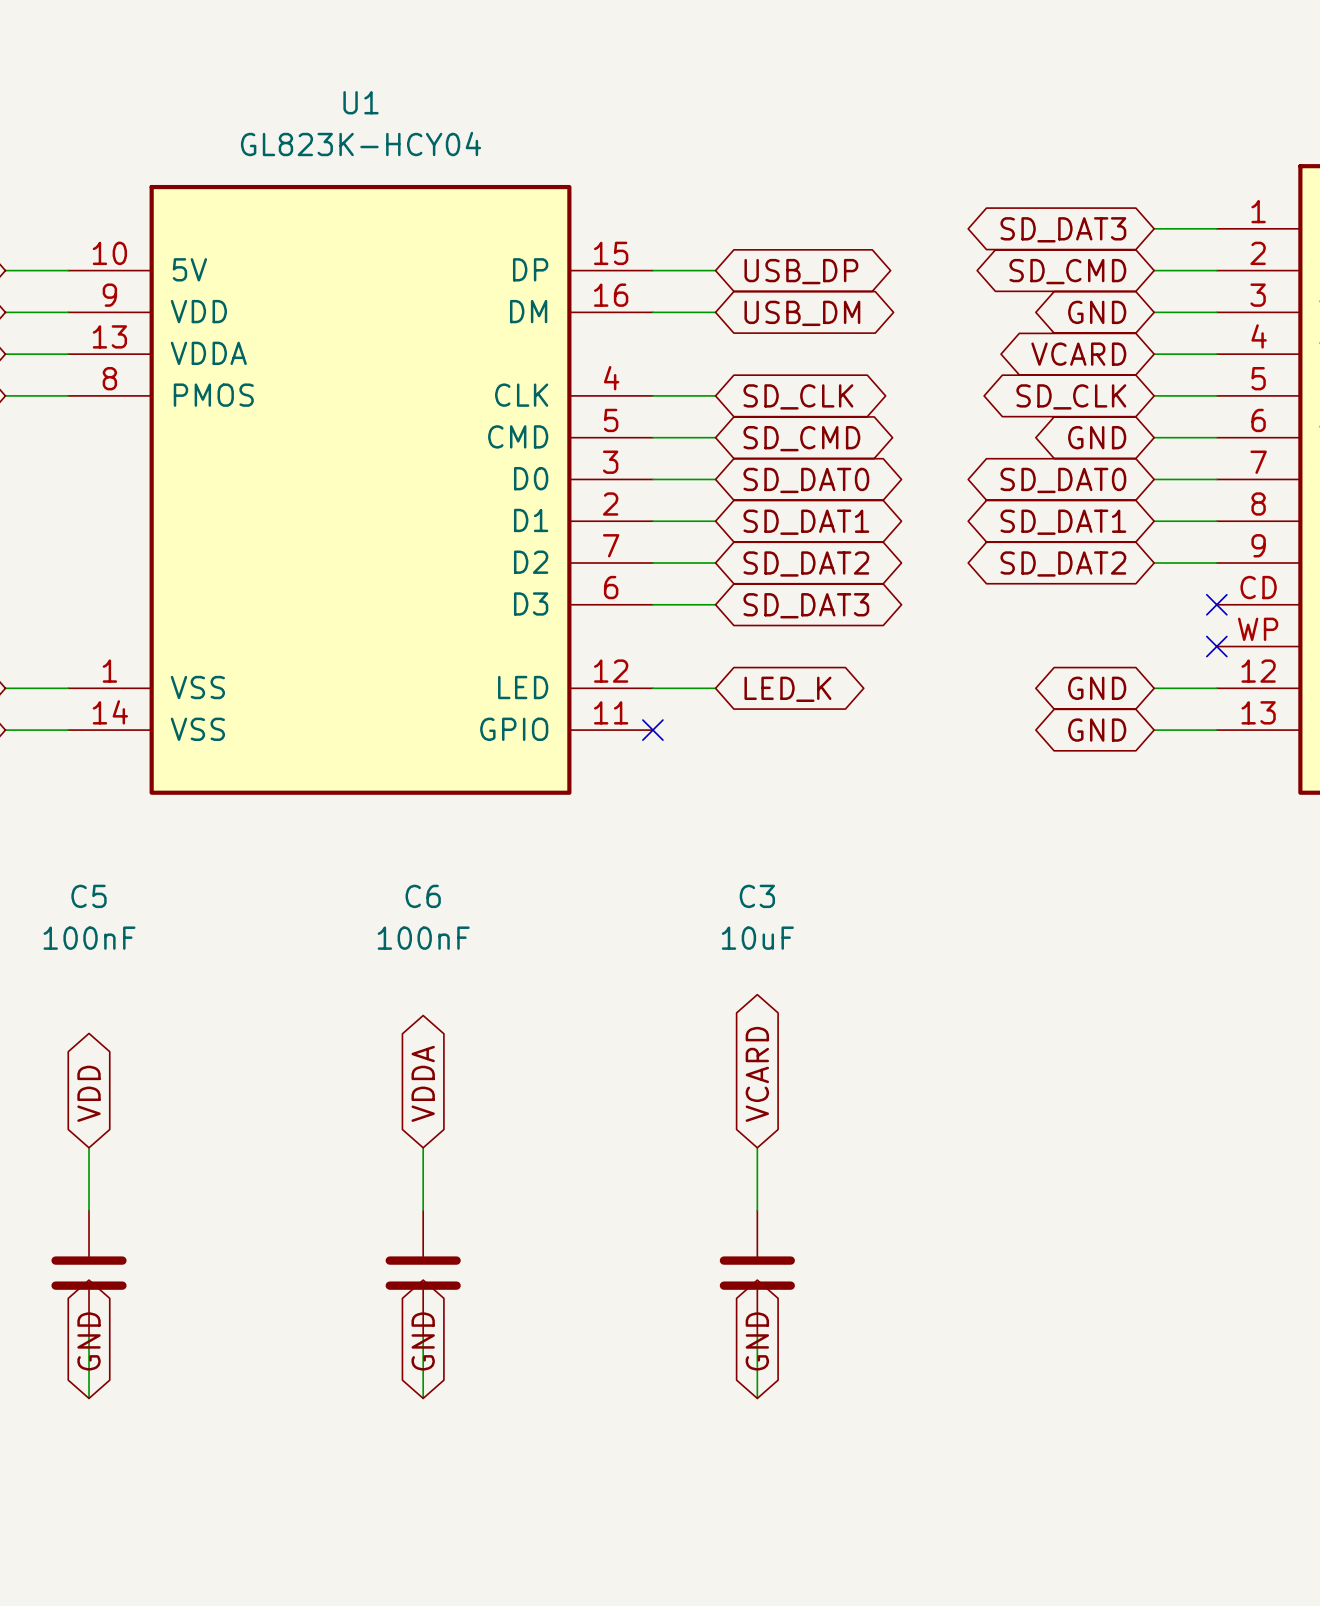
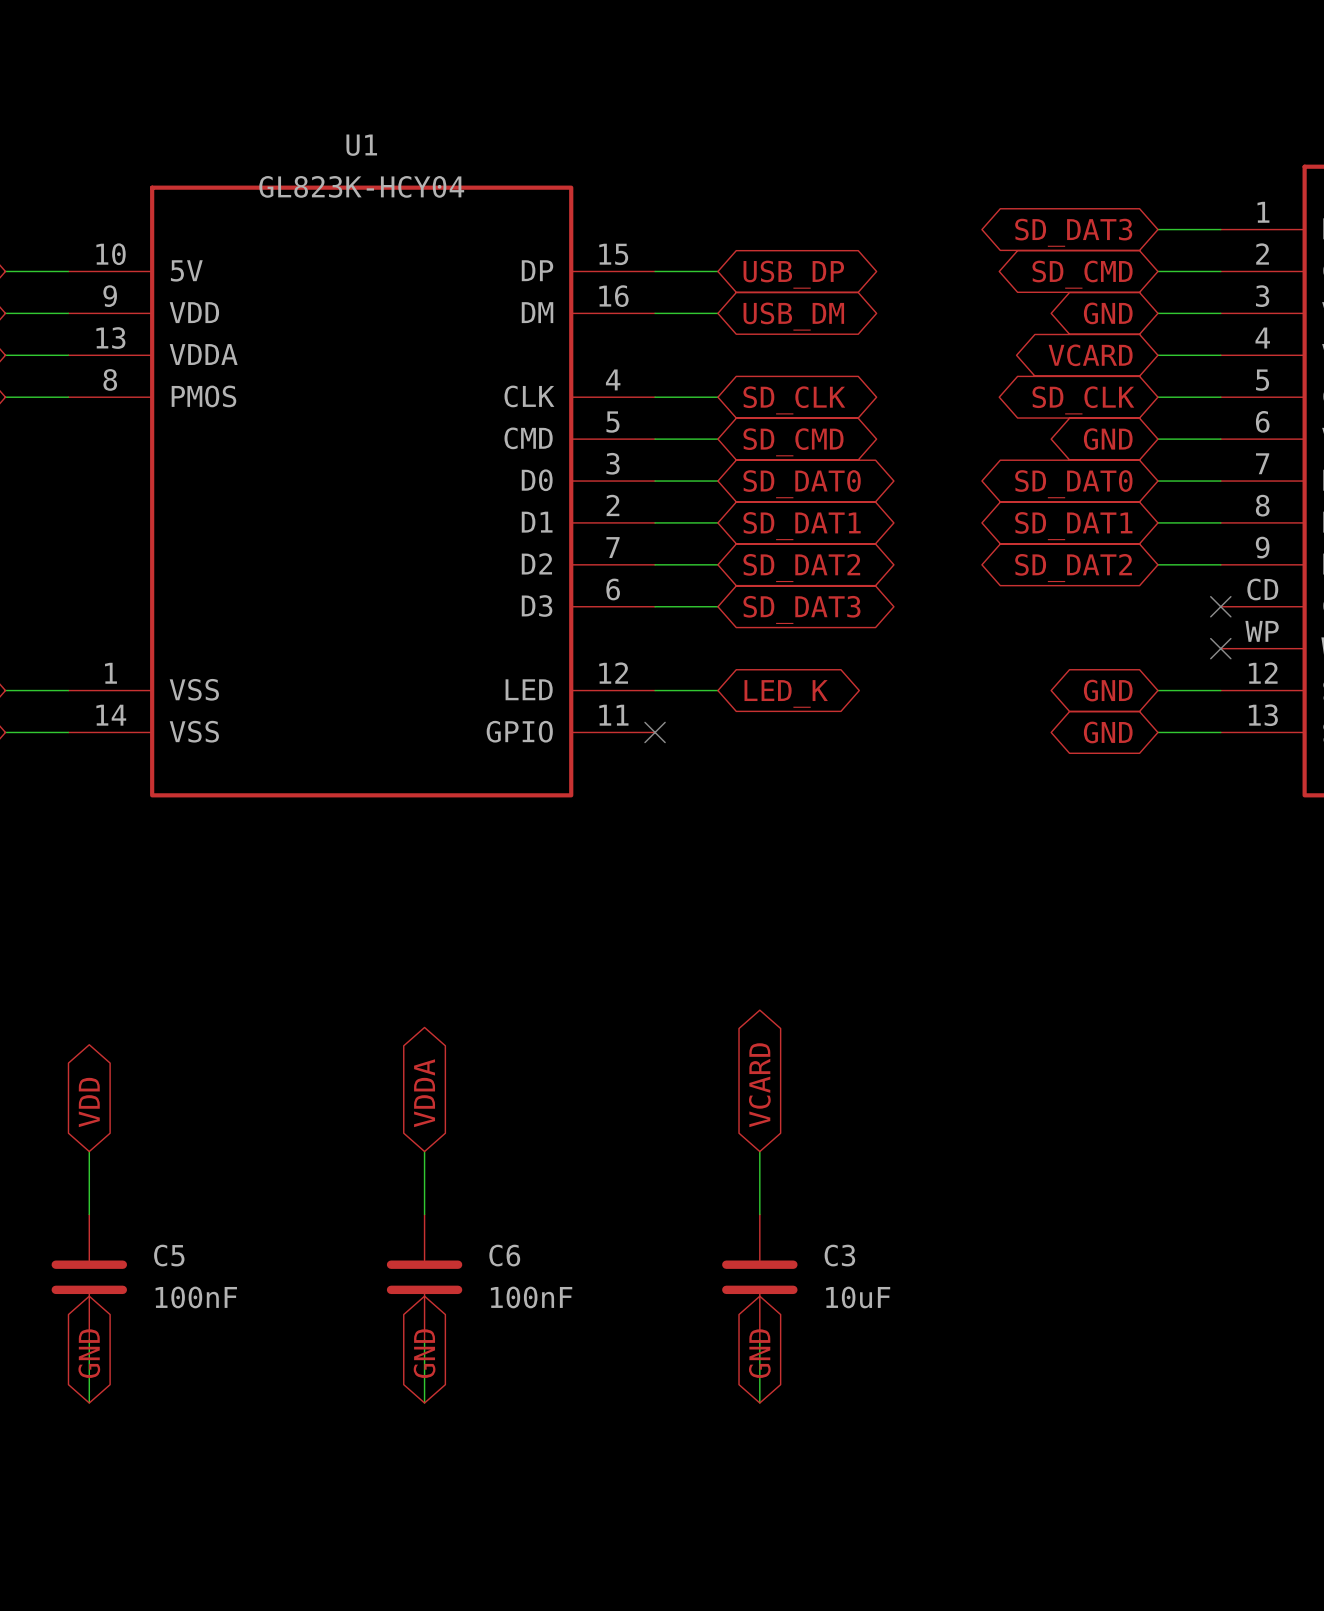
U1 name position: U1 (361, 102) -> U1 (361, 145)
U1 value position: GL823K-HCY04 (361, 144) -> GL823K-HCY04 (361, 186)
C5 name position: C5 (89, 896) -> C5 (169, 1255)
C6 name position: C6 (423, 896) -> C6 (504, 1255)
C3 name position: C3 (757, 896) -> C3 (839, 1255)
C5 value position: 100nF (89, 938) -> 100nF (196, 1297)
C6 value position: 100nF (423, 938) -> 100nF (531, 1297)
C3 value position: 10uF (757, 938) -> 10uF (858, 1297)

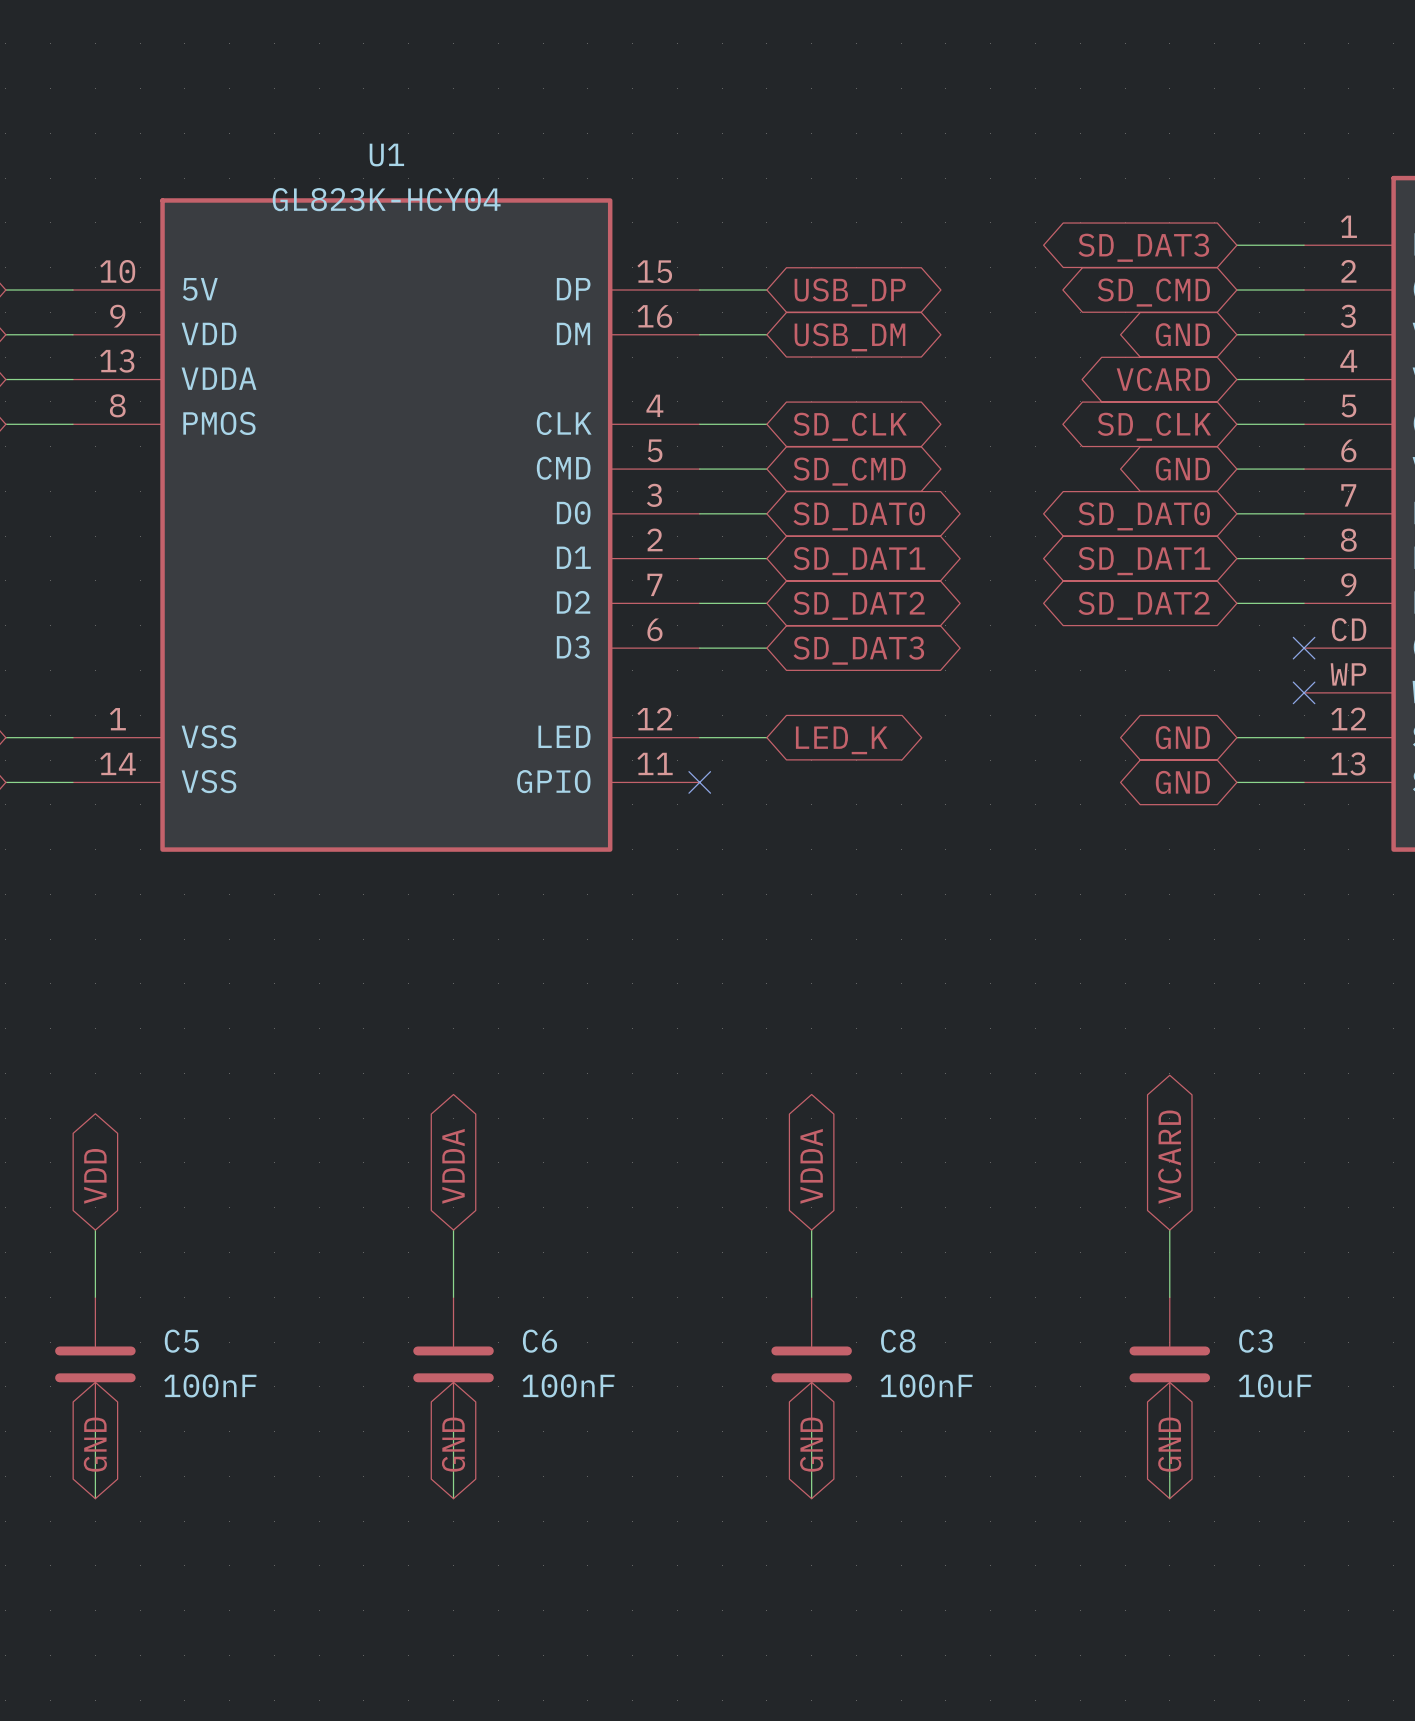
global label: VCARD (759, 1085) -> VDDA (811, 1166)
global label: none -> VCARD (1169, 1157)
wire: none -> (1169, 1230) (1169, 1297)
C3 name: C3 (839, 1255) -> C8 (898, 1341)
C3: none -> 10uF (1169, 1364)
C3 value: 10uF (858, 1297) -> 100nF (926, 1385)
wire: none -> (1169, 1431) (1169, 1498)
global label: none -> GND (1169, 1444)

